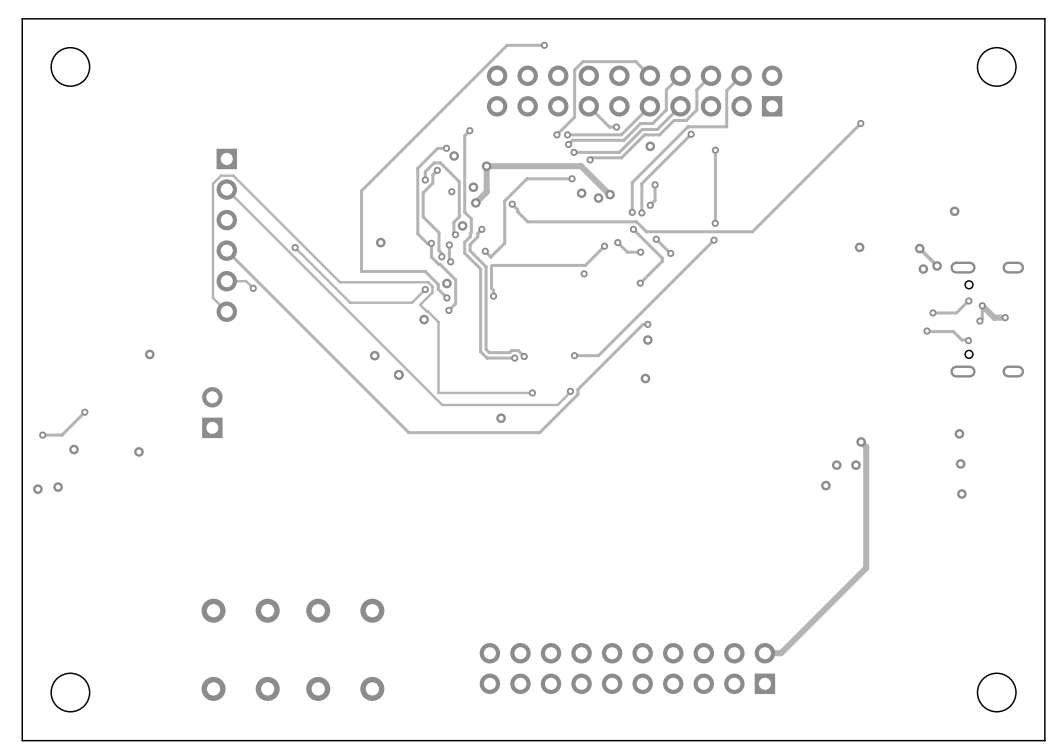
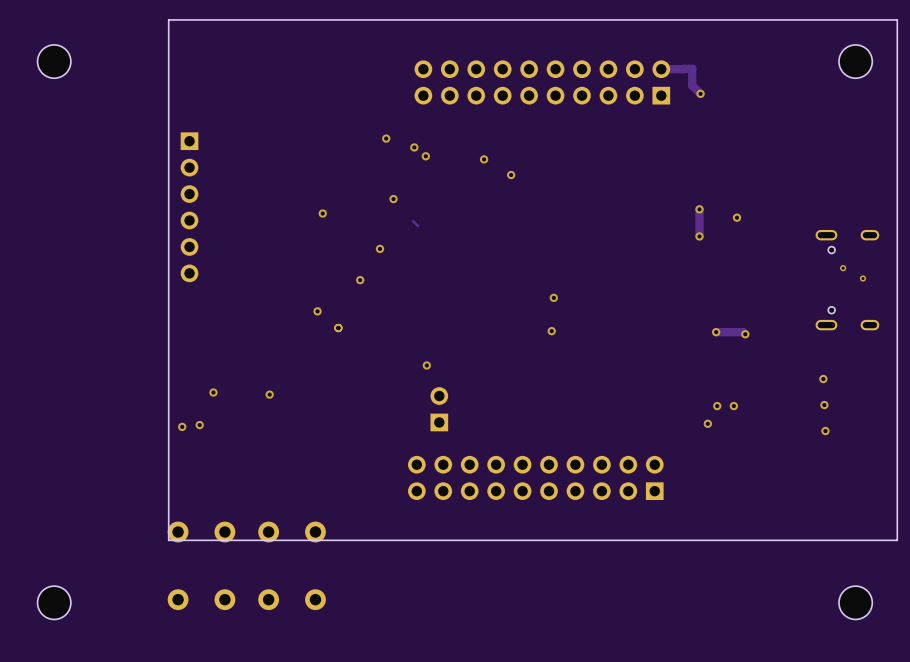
board edge: (202, 18) (22, 18) (22, 740) (1044, 740) (1044, 620) -> (168, 19) (168, 540) (897, 540)
track: (544, 45) (507, 45) (361, 190) (361, 271) (425, 271) (438, 284) (438, 289) (446, 297) -> none
via: (544, 45) -> none
track: (649, 75) (635, 61) (582, 61) (574, 69) (574, 117) (556, 134) -> none
track: (680, 75) (666, 89) (666, 109) (652, 123) (640, 123) (623, 140) (572, 140) (568, 144) -> none
track: (711, 75) (696, 89) (696, 109) (686, 120) (673, 120) (659, 134) (644, 134) (621, 157) (592, 157) (590, 159) -> none
track: (741, 75) (726, 90) (726, 126) (688, 126) (632, 182) (632, 212) -> none
track: none -> (661, 69) (692, 68) (692, 85) (700, 93)
via: none -> (700, 93)
track: (588, 106) (609, 127) (616, 127) -> none
track: (649, 106) (621, 134) (567, 134) -> none
track: (680, 106) (657, 129) (642, 129) (619, 152) (574, 152) -> none
track: (860, 123) (752, 231) (646, 231) (636, 221) (527, 221) (512, 204) -> none
via: (860, 123) -> none
via: (616, 127) -> none
track: (469, 130) (464, 135) (464, 212) (471, 218) (471, 232) (464, 242) (464, 253) (480, 269) (480, 351) (487, 358) (514, 358) -> none
via: (469, 130) -> none
via: (556, 134) -> none
via: (567, 134) -> none
track: (691, 134) (641, 183) (641, 212) -> none
via: (691, 134) -> none
via: (568, 144) -> none
via: (650, 146) -> none
track: (446, 148) (437, 148) (417, 168) (417, 233) (427, 243) (431, 243) (431, 257) (455, 279) (455, 303) (448, 310) -> none
via: (446, 148) -> none
track: (715, 150) (715, 223) -> none
via: (715, 150) -> none
via: (574, 152) -> none
via: (590, 159) -> none
track: (437, 170) (432, 174) (432, 183) (423, 192) (423, 216) (438, 232) (438, 250) (441, 256) -> none
via: (437, 170) -> none
via: none -> (425, 156)
track: (572, 178) (526, 178) (504, 201) (504, 243) (490, 257) -> none
via: (572, 178) -> none
track: (425, 180) (425, 171) (434, 162) (440, 162) (459, 181) (459, 216) (453, 222) (455, 234) -> none
via: (425, 180) -> none
track: (655, 184) (655, 200) (650, 205) -> none
via: (655, 184) -> none
via: (473, 187) -> none
track: (226, 189) (442, 404) (557, 404) (570, 391) -> none
via: (451, 191) -> none
via position: (581, 193) -> (484, 159)
track: (609, 194) (581, 166) (486, 166) (486, 192) (475, 202) -> none
via: (610, 194) -> none
via: (475, 202) -> none
via: (512, 204) -> none
via: (650, 205) -> none
via: (954, 211) -> none
via: (632, 212) -> none
via: (641, 212) -> none
via: (715, 223) -> none
track: (481, 229) (470, 244) (470, 250) (486, 266) (486, 349) (489, 352) (518, 350) (524, 356) -> none
via: (481, 229) -> none
track: (633, 229) (662, 258) (662, 261) (640, 283) -> none
via: (633, 229) -> none
via: (455, 234) -> none
track: none -> (699, 209) (699, 236)
via: none -> (699, 209)
track: (656, 239) (670, 253) -> none
via: (656, 239) -> none
track: (714, 240) (598, 355) (574, 355) -> none
via: (714, 240) -> none
track: (617, 242) (627, 252) (640, 252) -> none
via: (617, 242) -> none
via: (431, 243) -> none
track: (449, 244) (450, 261) -> none
via: (449, 244) -> none
track: (604, 246) (585, 265) (492, 265) (491, 288) (493, 296) -> none
via: (604, 246) -> none
track: (295, 247) (350, 302) (412, 302) (425, 289) -> none
via: (295, 247) -> none
track: (919, 248) (937, 265) -> none
via: (919, 248) -> none
track: (226, 250) (408, 432) (539, 432) (577, 394) (577, 389) (643, 324) (647, 324) -> none
via: (485, 251) -> none
via: (640, 252) -> none
via: (670, 253) -> none
via: (441, 256) -> none
via: (450, 261) -> none
via: (937, 265) -> none
via: none -> (699, 236)
via: (923, 269) -> none
via: (584, 273) -> none
track: (226, 281) (246, 281) (253, 288) -> none
via: (640, 283) -> none
via: (253, 288) -> none
via: (425, 289) -> none
via: (493, 296) -> none
via: (446, 297) -> none
track: (968, 301) (956, 312) (932, 312) -> none
via: (968, 301) -> none
via: (448, 310) -> none
track: (226, 311) (212, 297) (212, 183) (221, 175) (233, 175) (339, 282) (428, 282) (432, 286) (432, 292) (420, 304) (438, 322) (438, 392) (532, 392) -> none
via: (932, 312) -> none
track: (1005, 317) (994, 317) (982, 305) (982, 318) (979, 321) -> none
via: (979, 321) -> none
via: (647, 324) -> none
track: (926, 331) (953, 331) (961, 340) (968, 340) -> none
via: (926, 331) -> none
via: (968, 340) -> none
via: (149, 354) -> none
via: (574, 355) -> none
via: (524, 356) -> none
via: (514, 358) -> none
track: none -> (716, 332) (743, 332) (745, 334)
via: none -> (716, 332)
via: none -> (745, 334)
via: (570, 391) -> none
via: (532, 392) -> none
track: (84, 412) (61, 435) (42, 435) -> none
via: (84, 412) -> none
part: (212, 412) -> none
via: (42, 435) -> none
track: (861, 441) (866, 447) (866, 568) (780, 653) (764, 653) -> none
via: (861, 441) -> none
via: (74, 449) -> none
via: none -> (213, 392)
via: (138, 451) -> none
via: none -> (269, 394)
part: none -> (439, 409)
via: (58, 487) -> none
via: none -> (199, 425)
via: (37, 489) -> none
via: none -> (182, 426)
part position: (627, 668) -> (535, 477)

